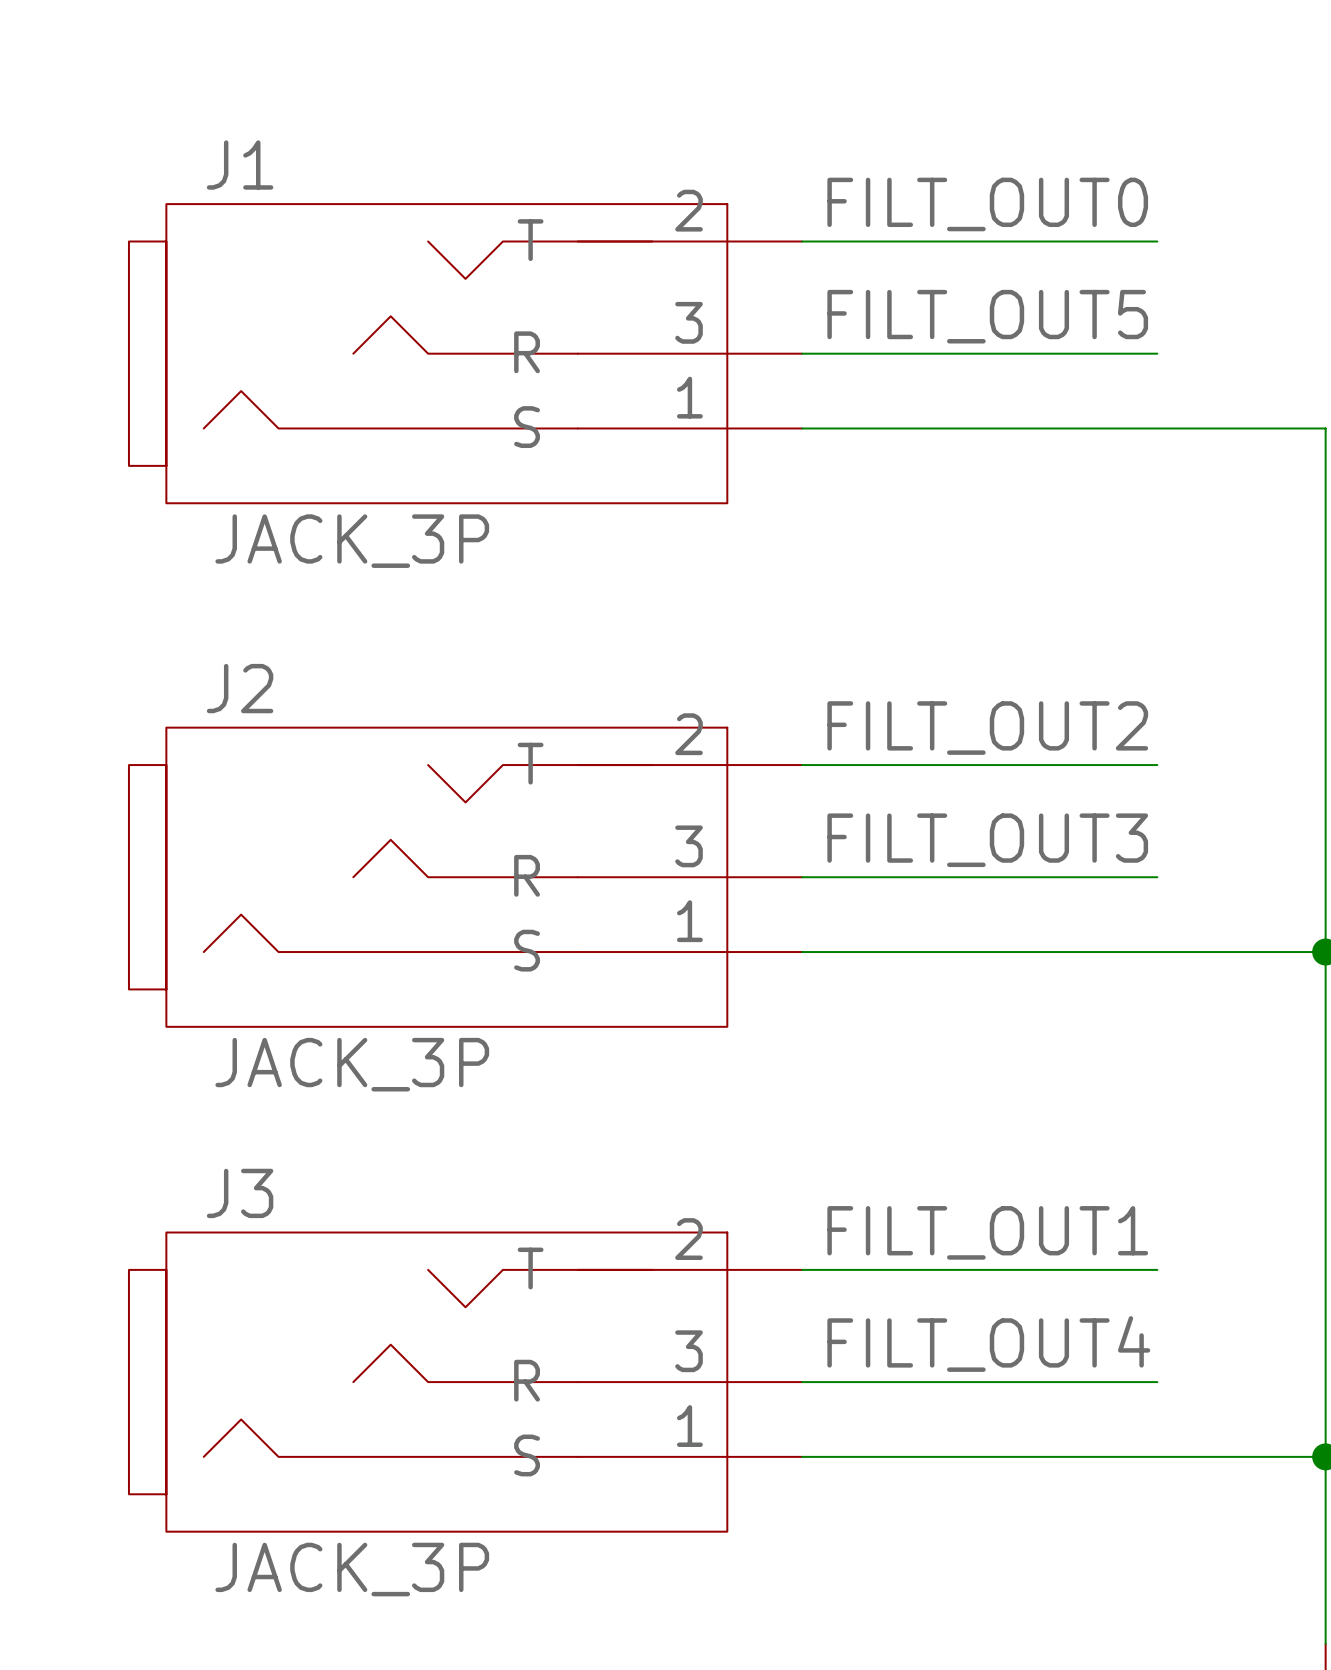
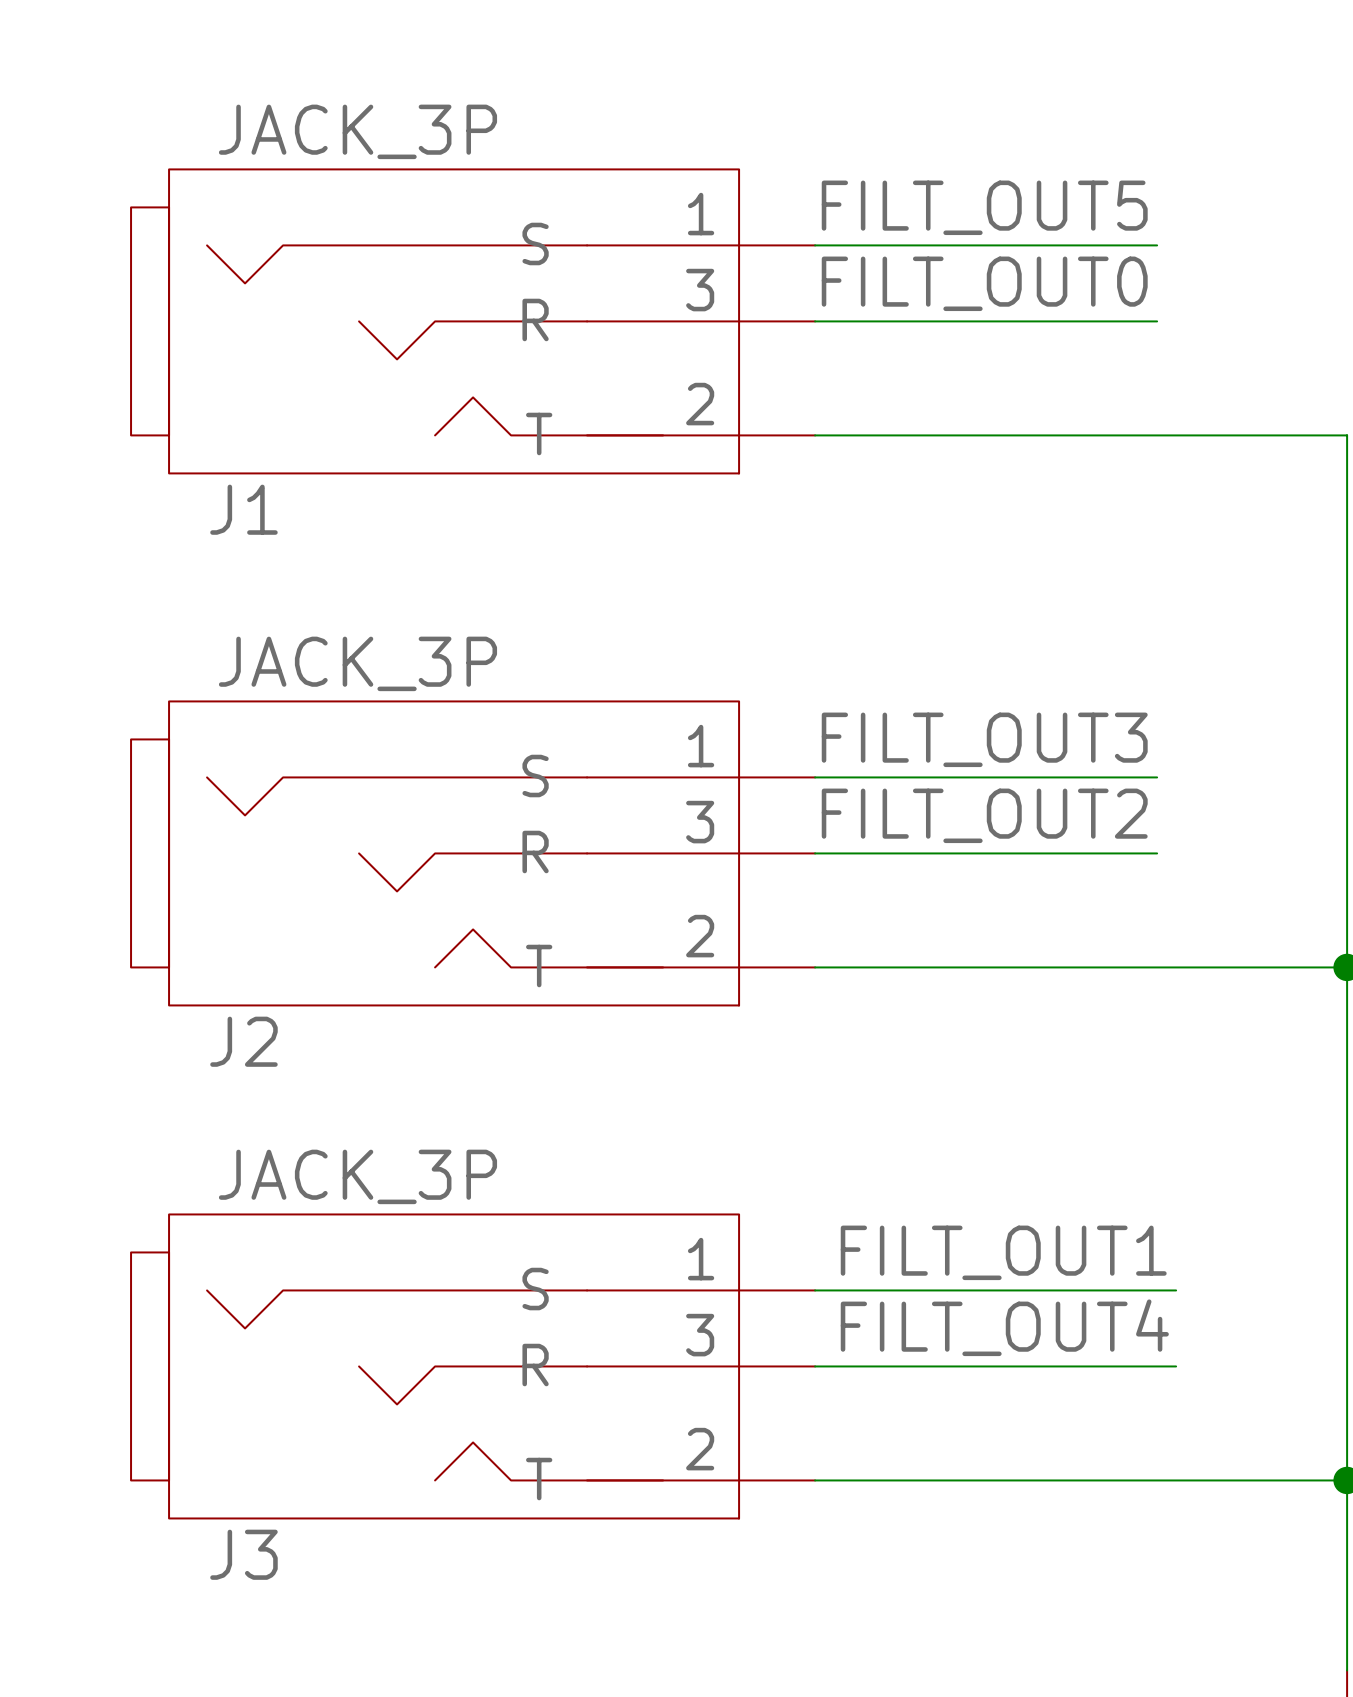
label position: FILT_OUT0 (987, 204) -> FILT_OUT0 (984, 283)
wire: (1138, 241) (1157, 241) -> none
wire: none -> (815, 321) (1157, 321)
label position: FILT_OUT5 (987, 316) -> FILT_OUT5 (984, 207)
J1 flip: as is (428, 353) -> up-down (435, 321)
wire: (802, 353) (1157, 353) -> none
label position: FILT_OUT2 (987, 728) -> FILT_OUT2 (984, 815)
wire: (1138, 765) (1157, 765) -> none
wire: none -> (815, 853) (1157, 853)
label position: FILT_OUT3 (987, 840) -> FILT_OUT3 (984, 739)
J2 flip: as is (428, 877) -> up-down (435, 853)
wire: (802, 877) (1157, 877) -> none
label position: FILT_OUT4 (988, 1344) -> FILT_OUT4 (1004, 1327)
J3 flip: as is (428, 1382) -> up-down (435, 1366)
wire: (802, 1382) (1157, 1382) -> (815, 1366) (1176, 1366)

